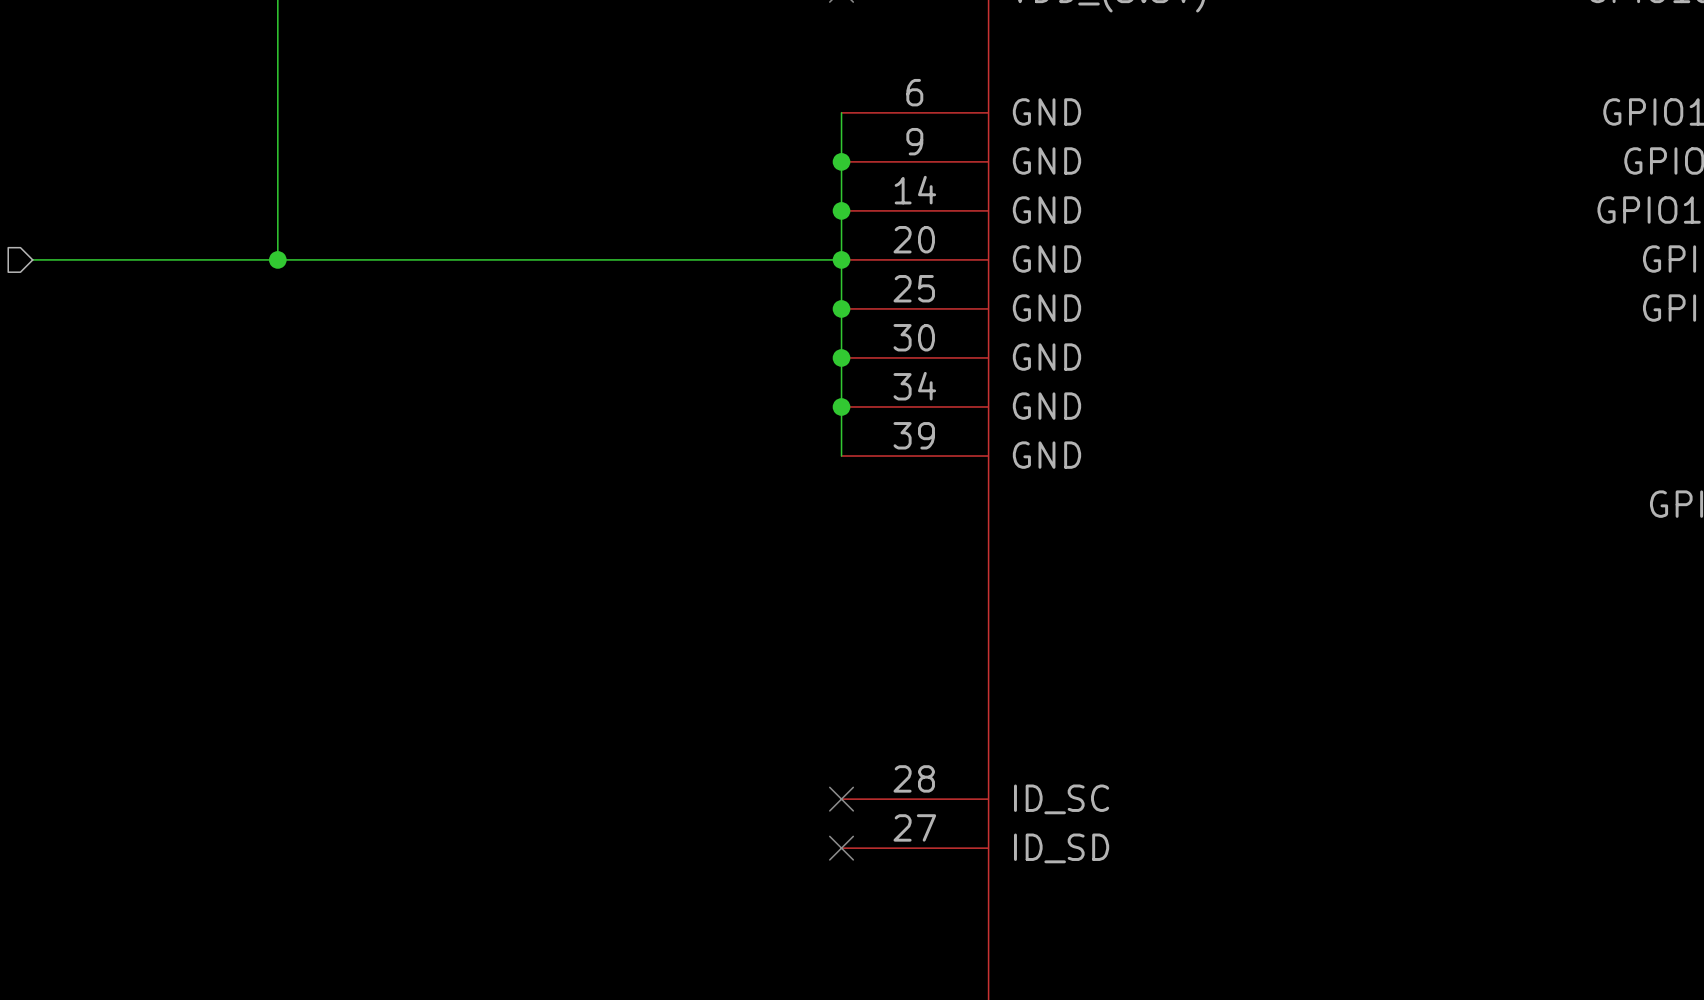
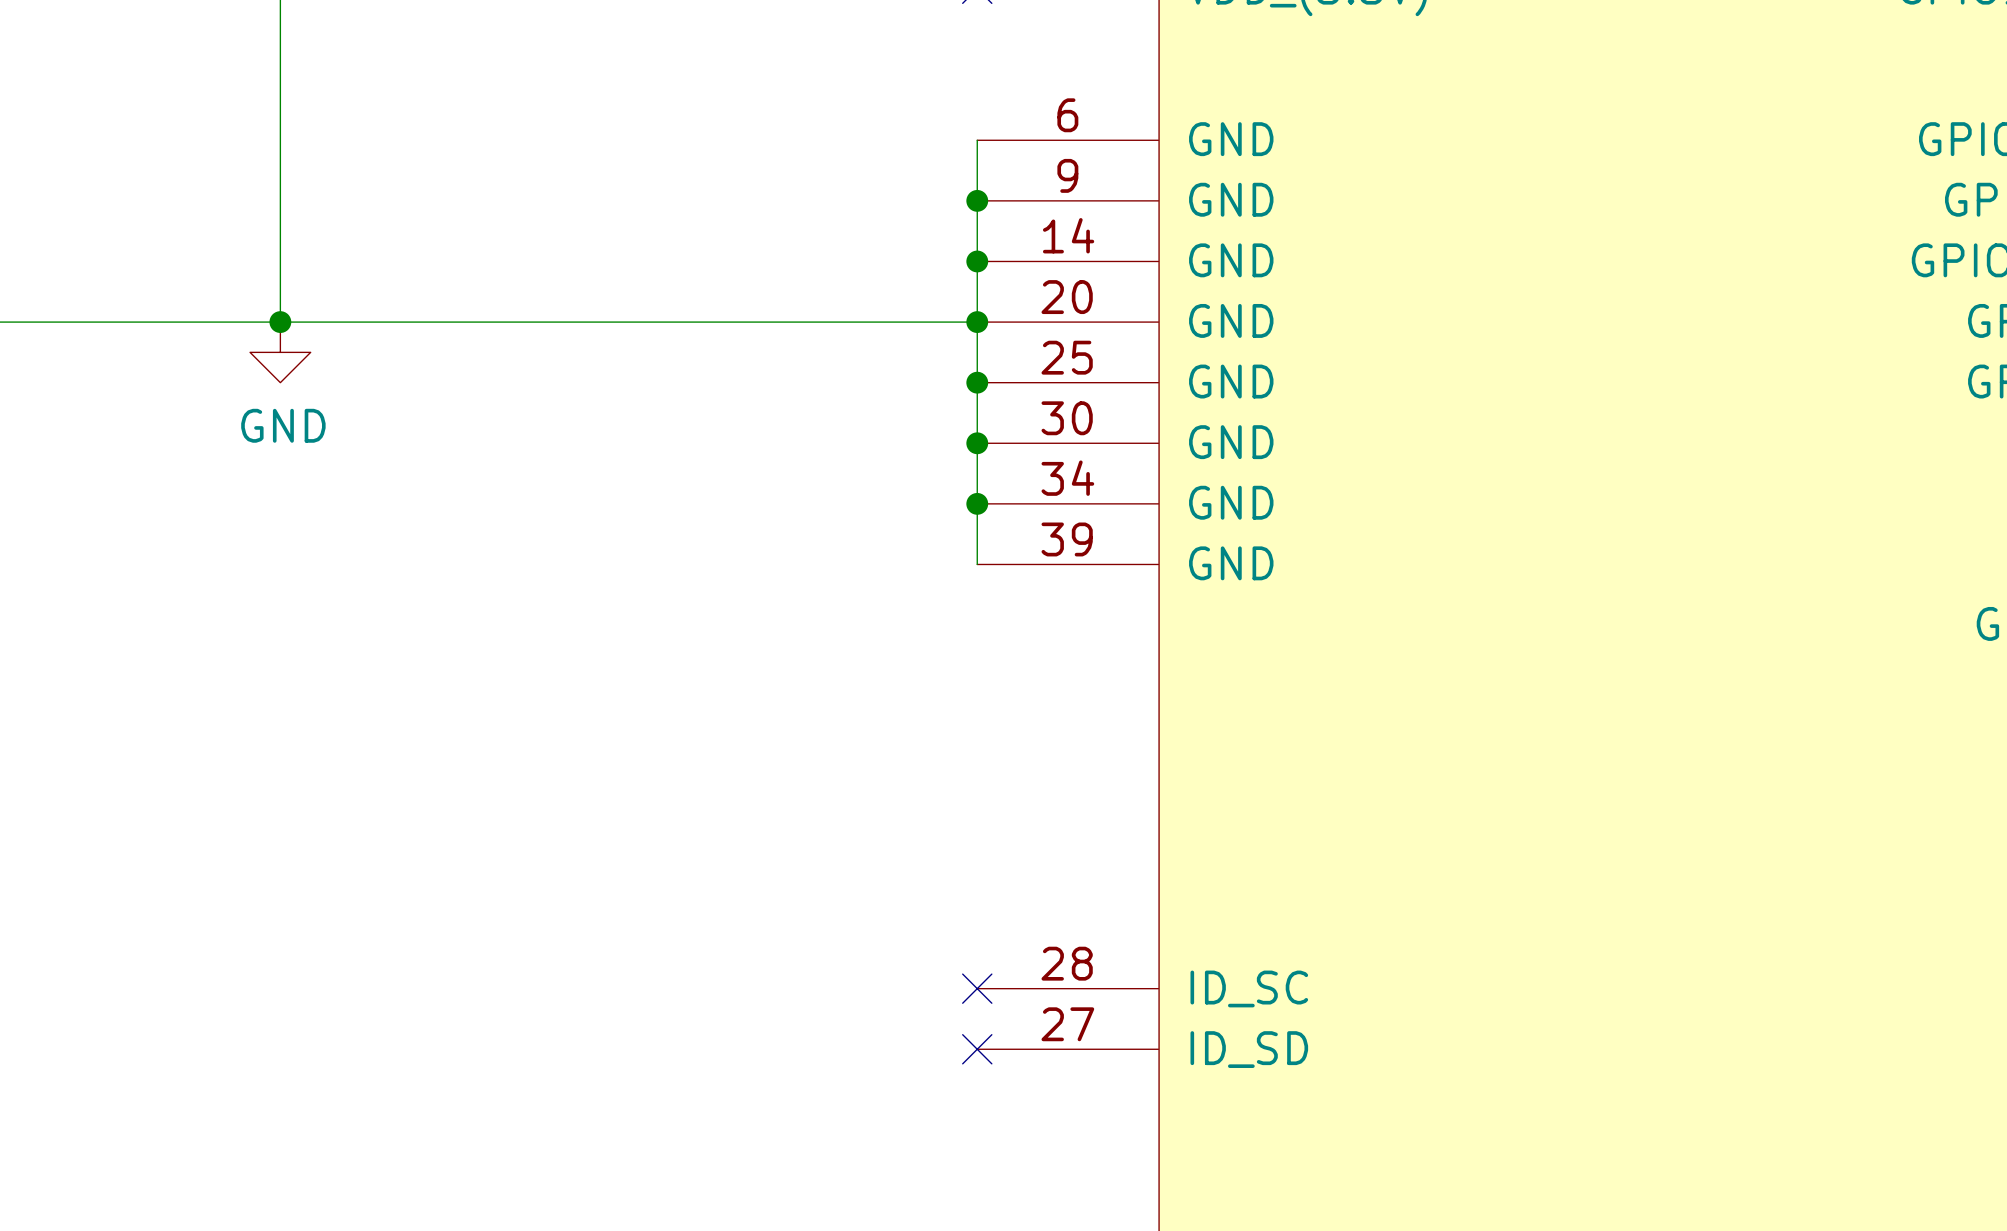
power symbol: none -> GND (280, 352)

